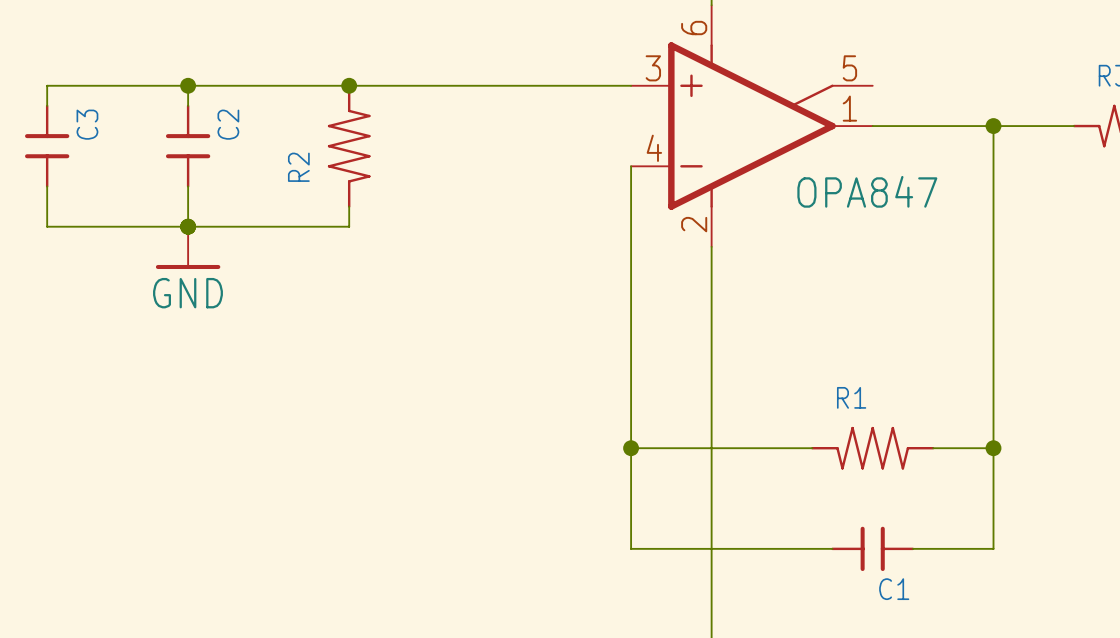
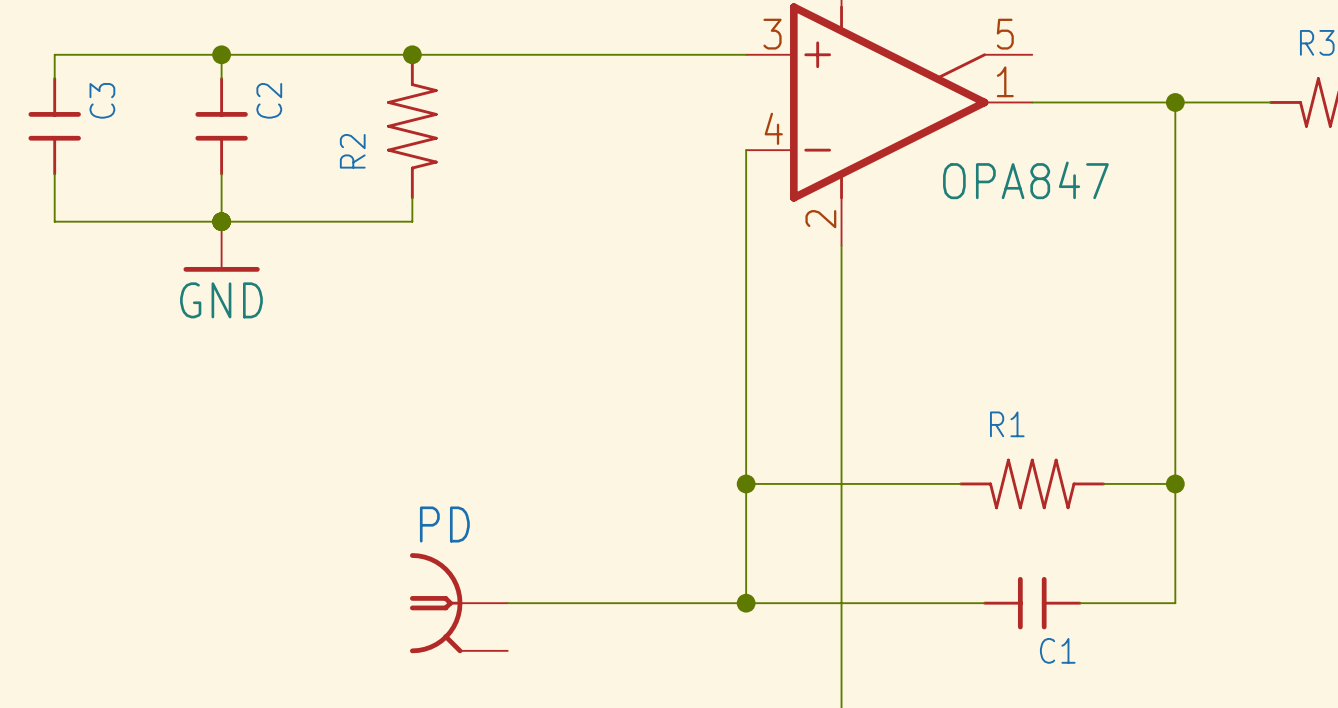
PD: none -> (458, 603)
wire: none -> (507, 603) (746, 603)
junction: none -> (746, 603)

